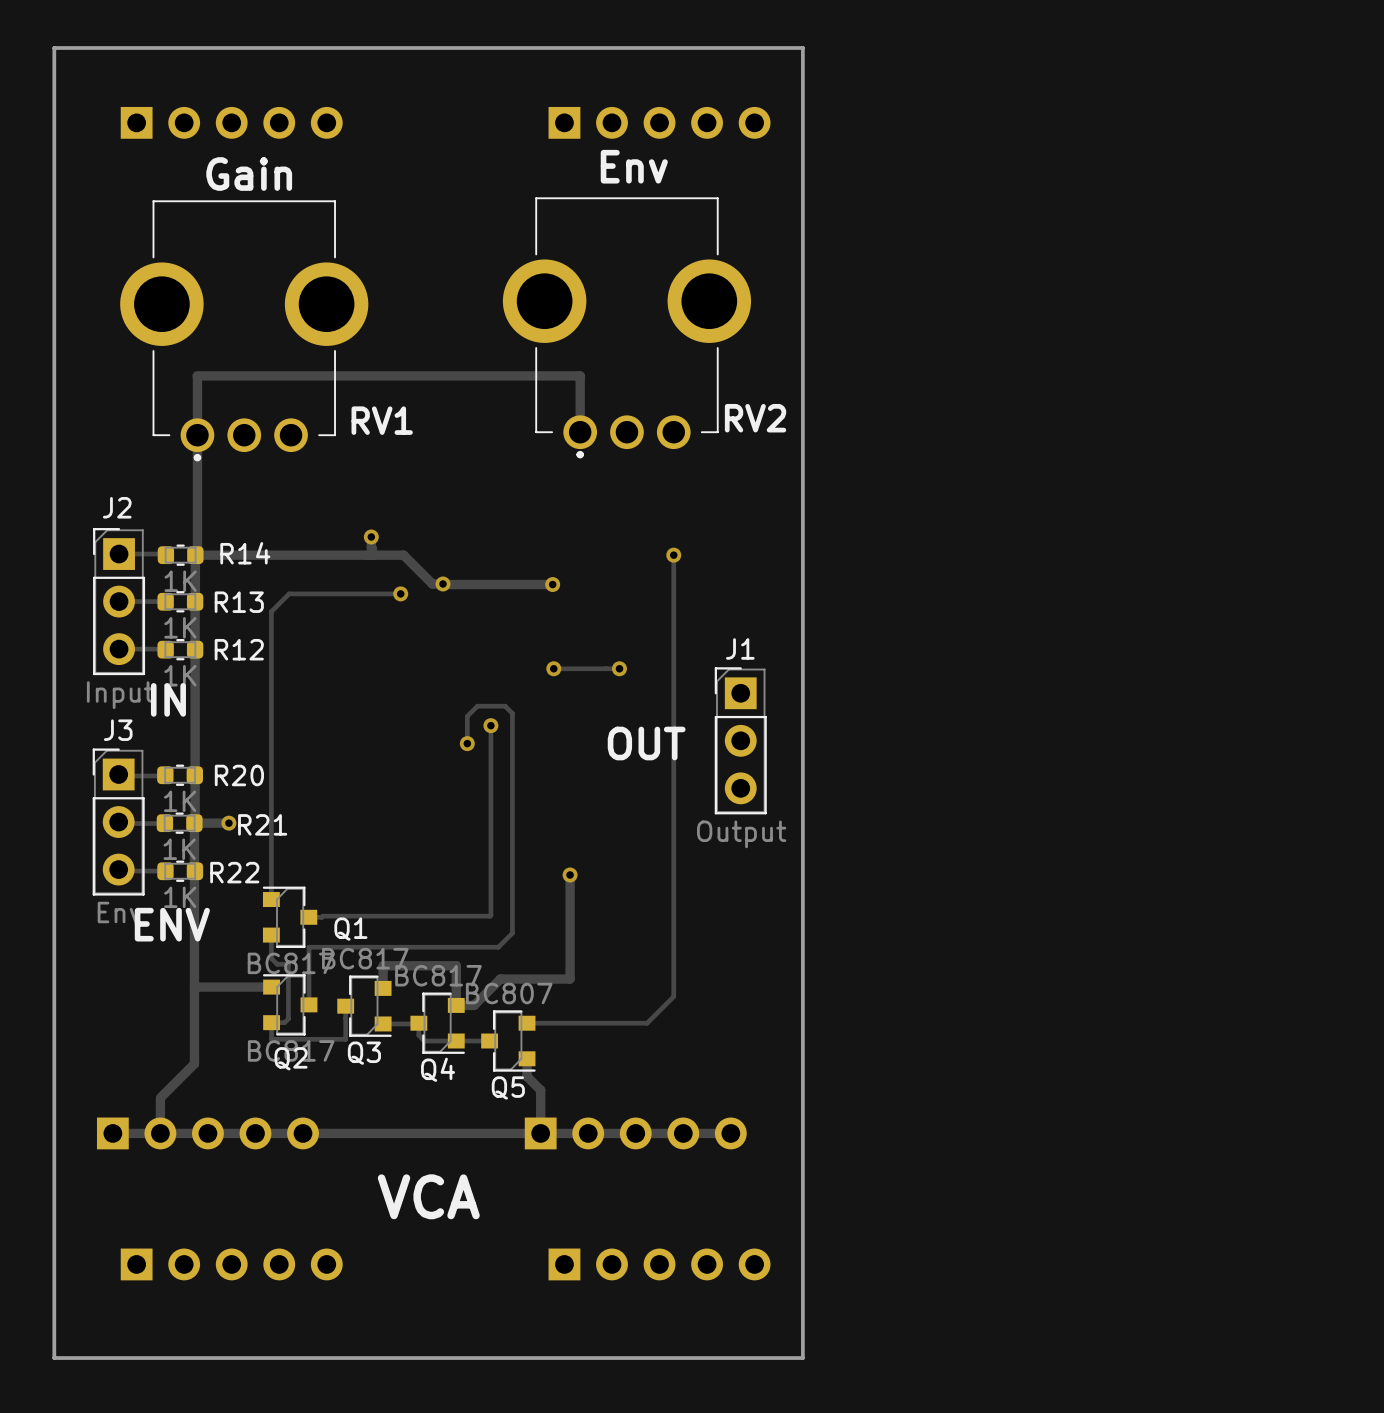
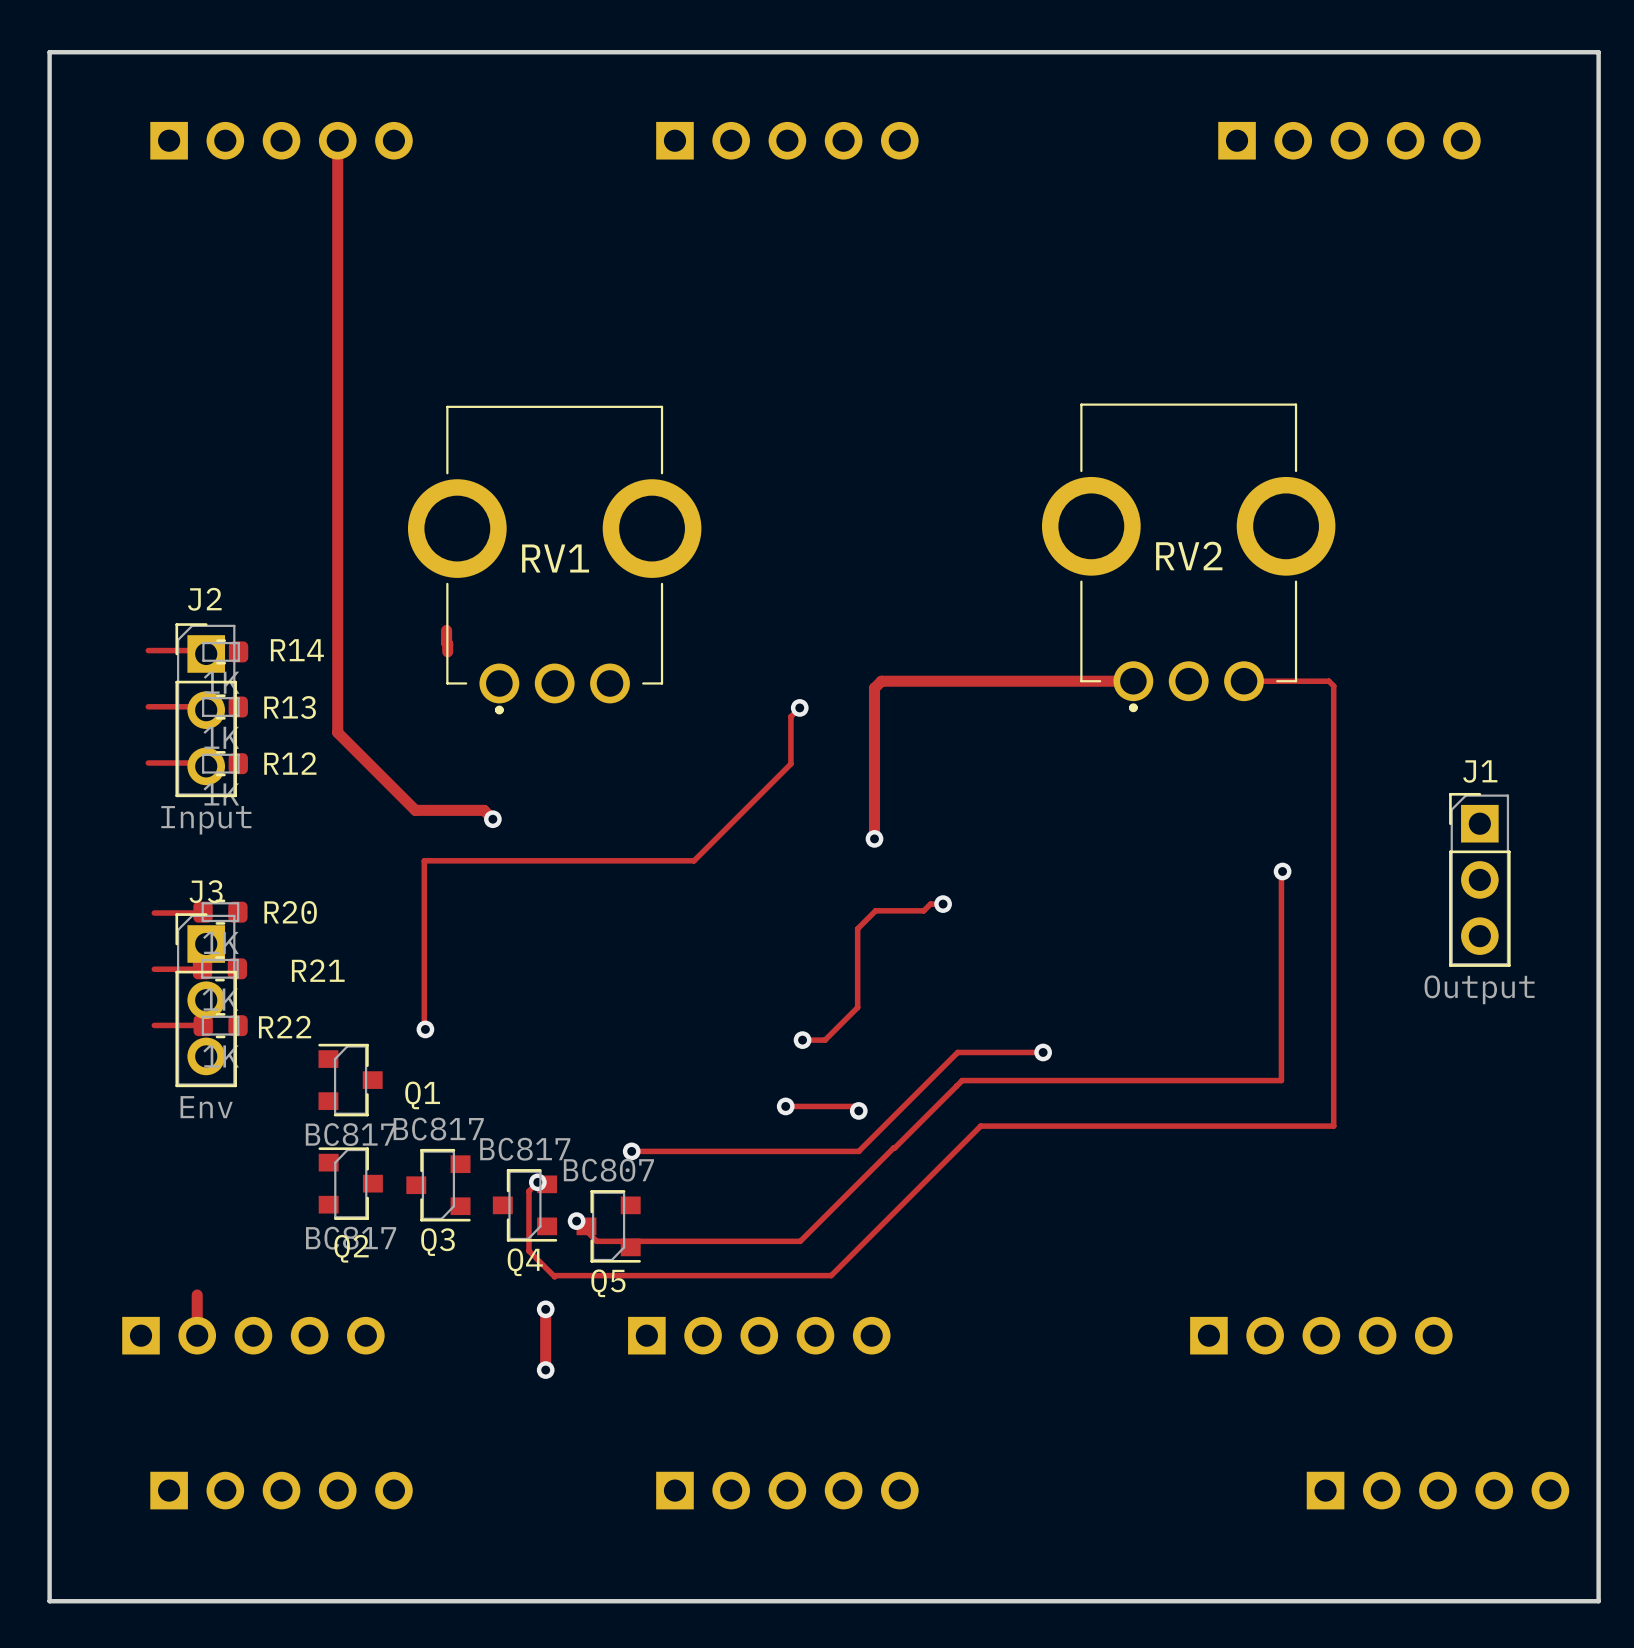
board edge: (54, 47) (54, 1358) -> (71, 52) (49, 52) (49, 1601) (71, 1601)
board edge: (802, 47) (802, 1358) -> (956, 52) (1598, 52) (1598, 1601) (956, 1601)
track: none -> (337, 140) (337, 732) (415, 810) (484, 810) (492, 819)
part: none -> (1349, 140)
text: Env (634, 166) -> none
text: Gain (249, 174) -> none
RV2 position: (626, 327) -> (1188, 557)
RV1 position: (244, 330) -> (554, 560)
track: (197, 375) (580, 375) -> none
track: (579, 376) (580, 432) -> none
track: (197, 377) (197, 553) (195, 555) -> none
RV2 name position: RV2 (755, 418) -> RV2 (1189, 556)
RV1 name position: RV1 (382, 420) -> RV1 (555, 558)
via: (371, 537) -> none
track: (195, 555) (195, 601) -> none
track: (195, 555) (403, 555) (432, 583) (552, 584) -> none
track: (673, 555) (673, 996) (647, 1023) (527, 1023) -> none
via: (673, 555) -> none
track: none -> (1133, 681) (881, 681) (874, 688) (874, 838)
track: none -> (1244, 681) (1328, 681) (1333, 686) (1333, 1126) (980, 1126) (831, 1275) (554, 1276) (528, 1251) (528, 1191) (537, 1182)
via: (443, 583) -> none
via: (552, 584) -> none
track: (400, 593) (289, 593) (271, 611) (271, 899) -> none
via: (400, 593) -> none
J2 position: (119, 601) -> (206, 710)
track: (195, 601) (195, 817) (200, 823) (228, 823) -> none
track: none -> (799, 707) (790, 716) (790, 763) (694, 860) (424, 860) (425, 1029)
via: none -> (799, 707)
track: (553, 668) (619, 668) -> none
via: (553, 668) -> none
via: (619, 668) -> none
via: none -> (492, 819)
text: IN (168, 699) -> none
via: none -> (874, 838)
track: (490, 725) (490, 915) (308, 917) -> none
via: (490, 725) -> none
J1 position: (740, 740) -> (1479, 879)
track: none -> (1282, 871) (1281, 1080) (962, 1080) (800, 1241) (596, 1241) (576, 1221)
via: none -> (1282, 871)
track: (467, 743) (467, 716) (477, 706) (505, 706) (512, 713) (512, 933) (498, 947) (309, 947) (309, 1004) -> none
via: (467, 743) -> none
text: OUT (646, 743) -> none
track: none -> (943, 904) (930, 904) (923, 910) (875, 910) (857, 928) (857, 1007) (825, 1040) (802, 1040)
via: none -> (943, 904)
J3 position: (118, 822) -> (206, 1000)
track: (200, 822) (194, 828) (194, 1063) (160, 1097) -> none
via: (228, 823) -> none
via: none -> (425, 1029)
track: (570, 875) (570, 979) (500, 979) (474, 1005) (456, 1005) (456, 965) (383, 965) (383, 988) -> none
via: (570, 875) -> none
via: none -> (802, 1040)
track: none -> (1043, 1052) (957, 1052) (858, 1151) (631, 1151)
via: none -> (1043, 1052)
text: ENV (172, 924) -> none
track: (271, 935) (271, 958) (277, 964) (288, 964) (288, 1018) (284, 1022) (271, 1022) (271, 1039) (345, 1039) (345, 1006) -> none
track: none -> (785, 1106) (854, 1106) (858, 1110)
via: none -> (785, 1106)
via: none -> (858, 1110)
via: none -> (631, 1151)
track: (194, 985) (271, 987) -> none
via: none -> (537, 1182)
track: (383, 1023) (418, 1023) (418, 1035) (424, 1041) -> none
via: none -> (576, 1221)
track: (424, 1041) (489, 1041) -> none
track: (527, 1058) (527, 1076) (540, 1090) (540, 1133) -> none
track: none -> (545, 1309) (545, 1370)
via: none -> (545, 1309)
track: (112, 1133) (730, 1133) -> none
part: none -> (1321, 1335)
via: none -> (545, 1370)
text: VCA (428, 1196) -> none
part: none -> (1437, 1490)

